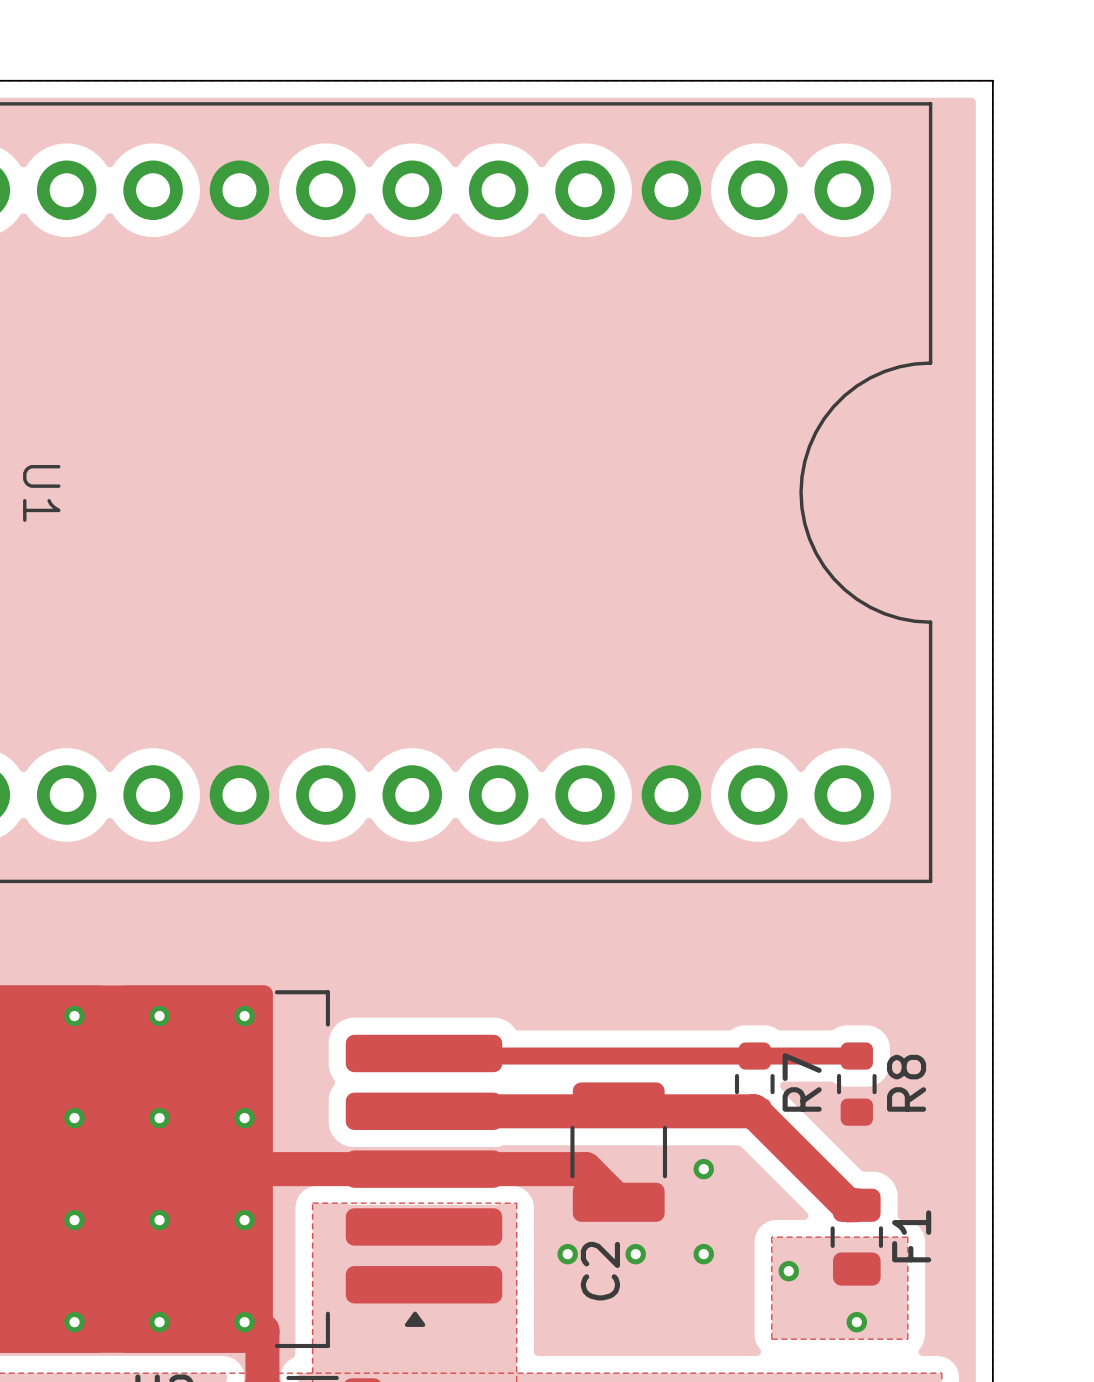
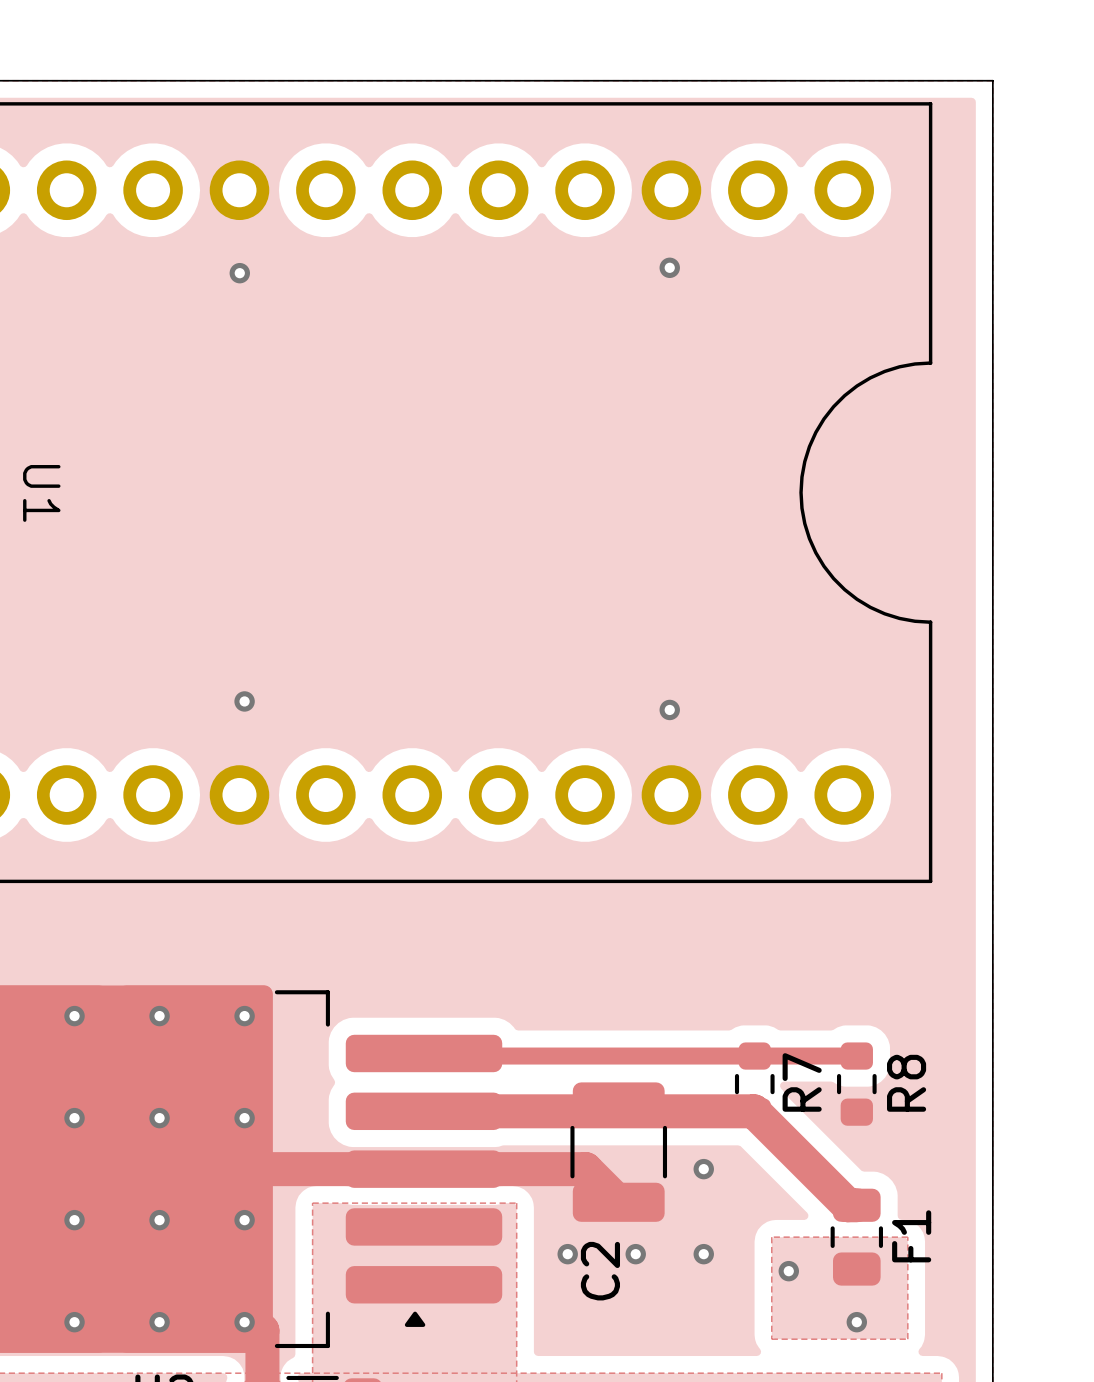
via: none -> (669, 267)
via: none -> (239, 273)
via: none -> (244, 701)
via: none -> (669, 709)

